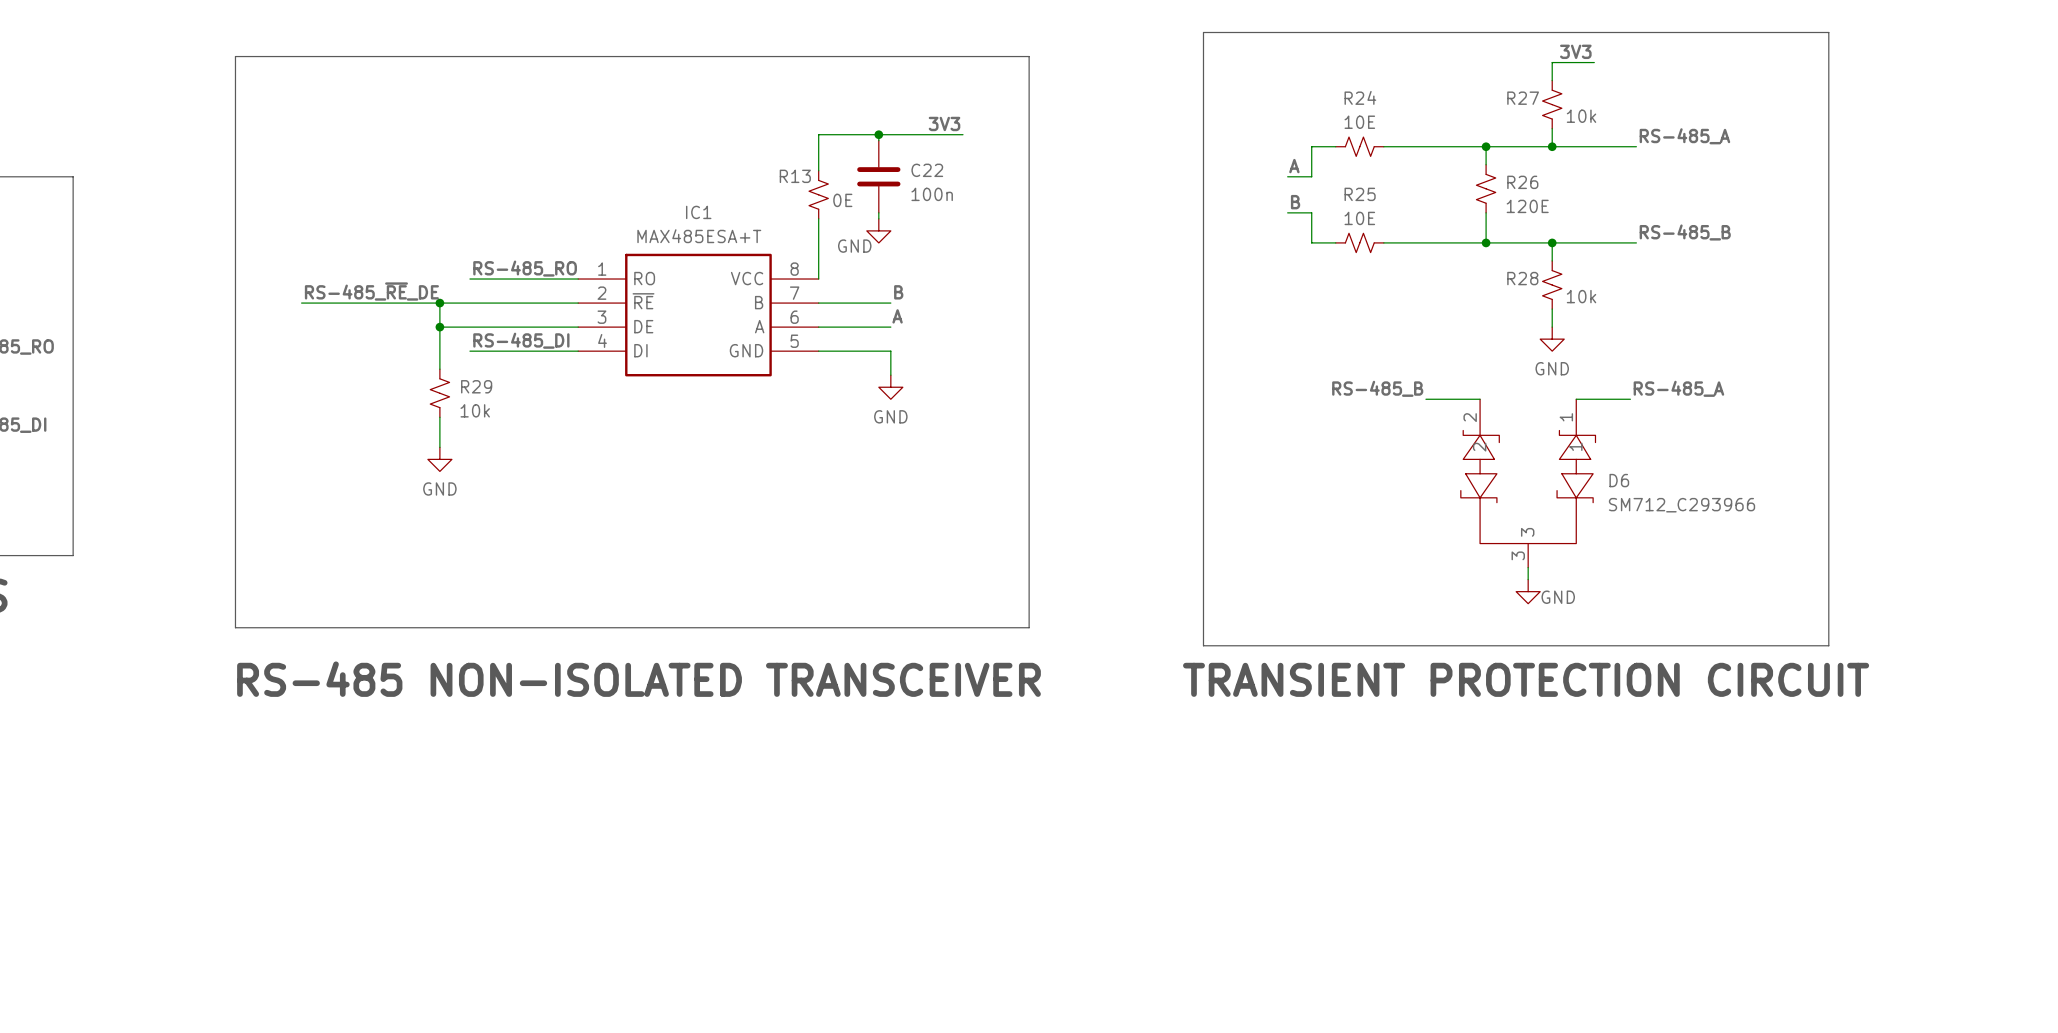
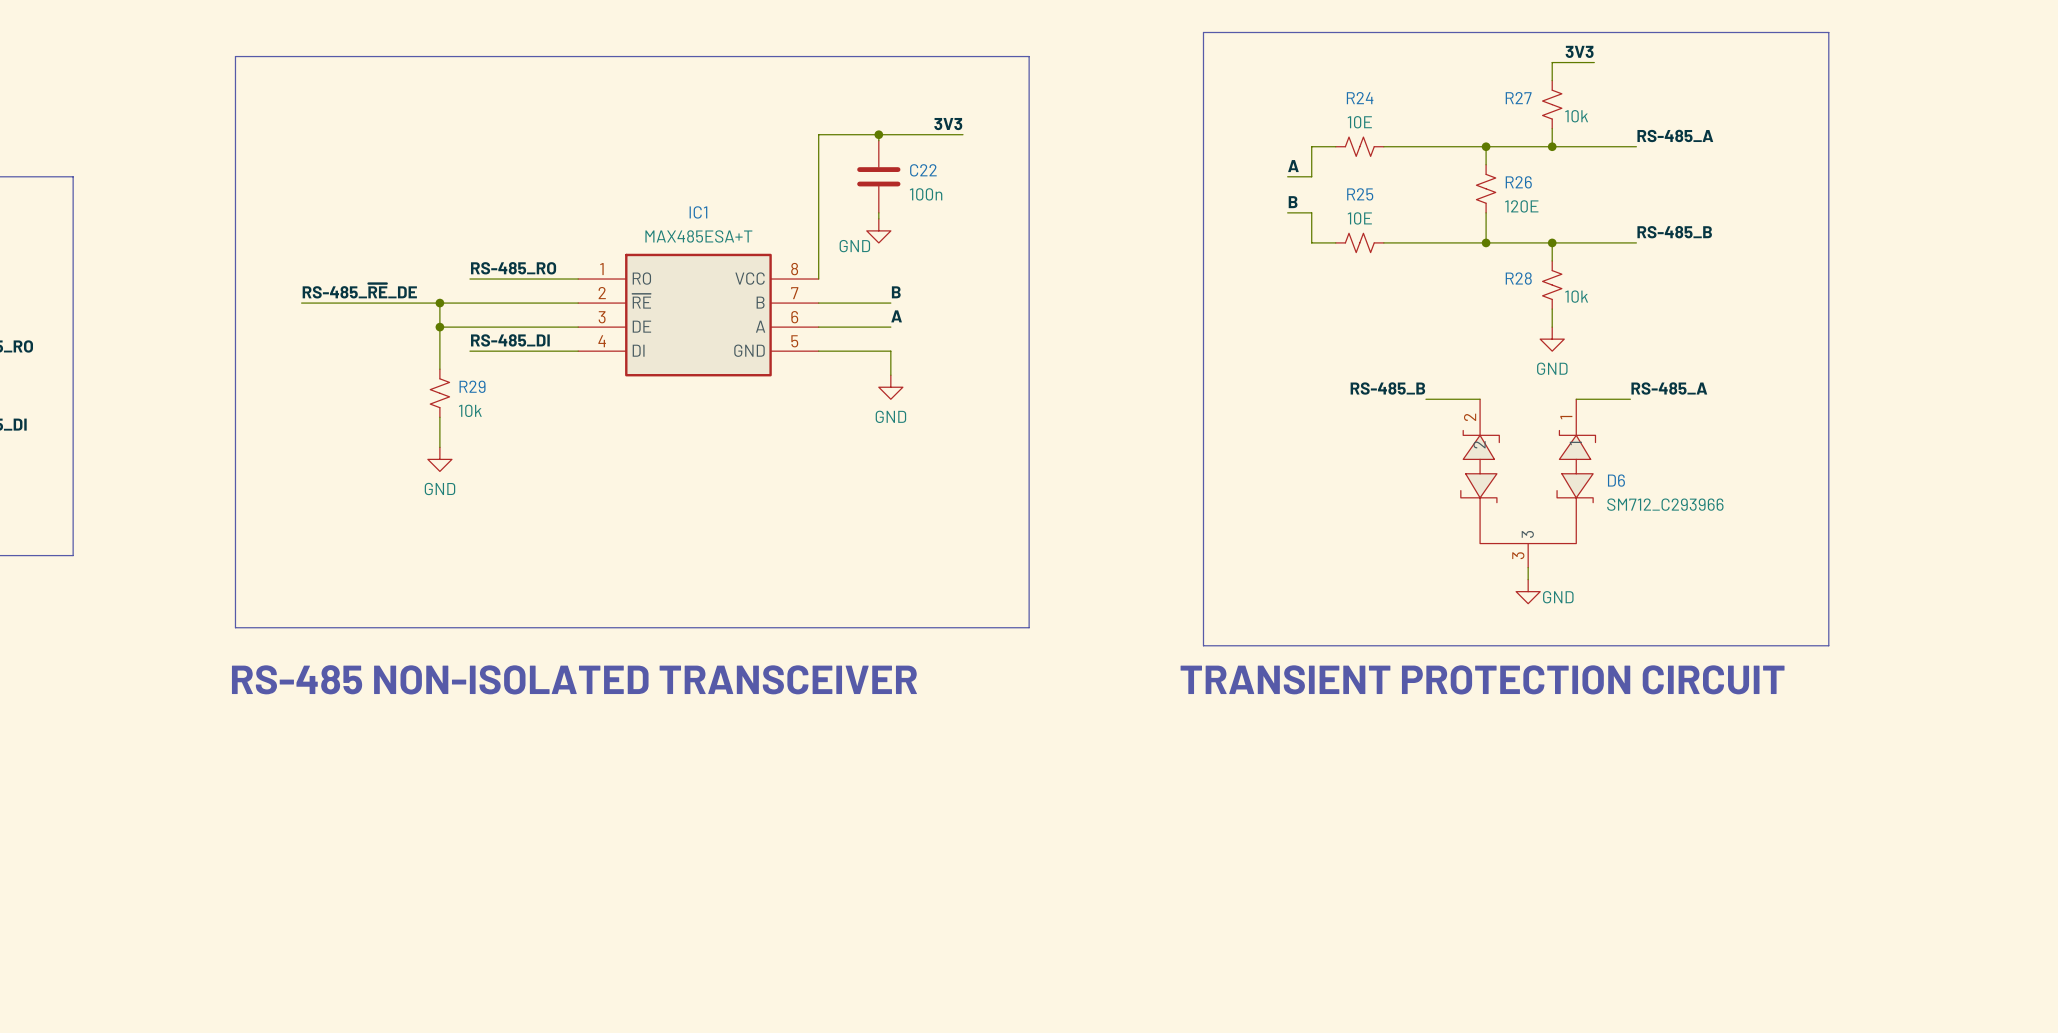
R13: 0E (818, 194) -> none

